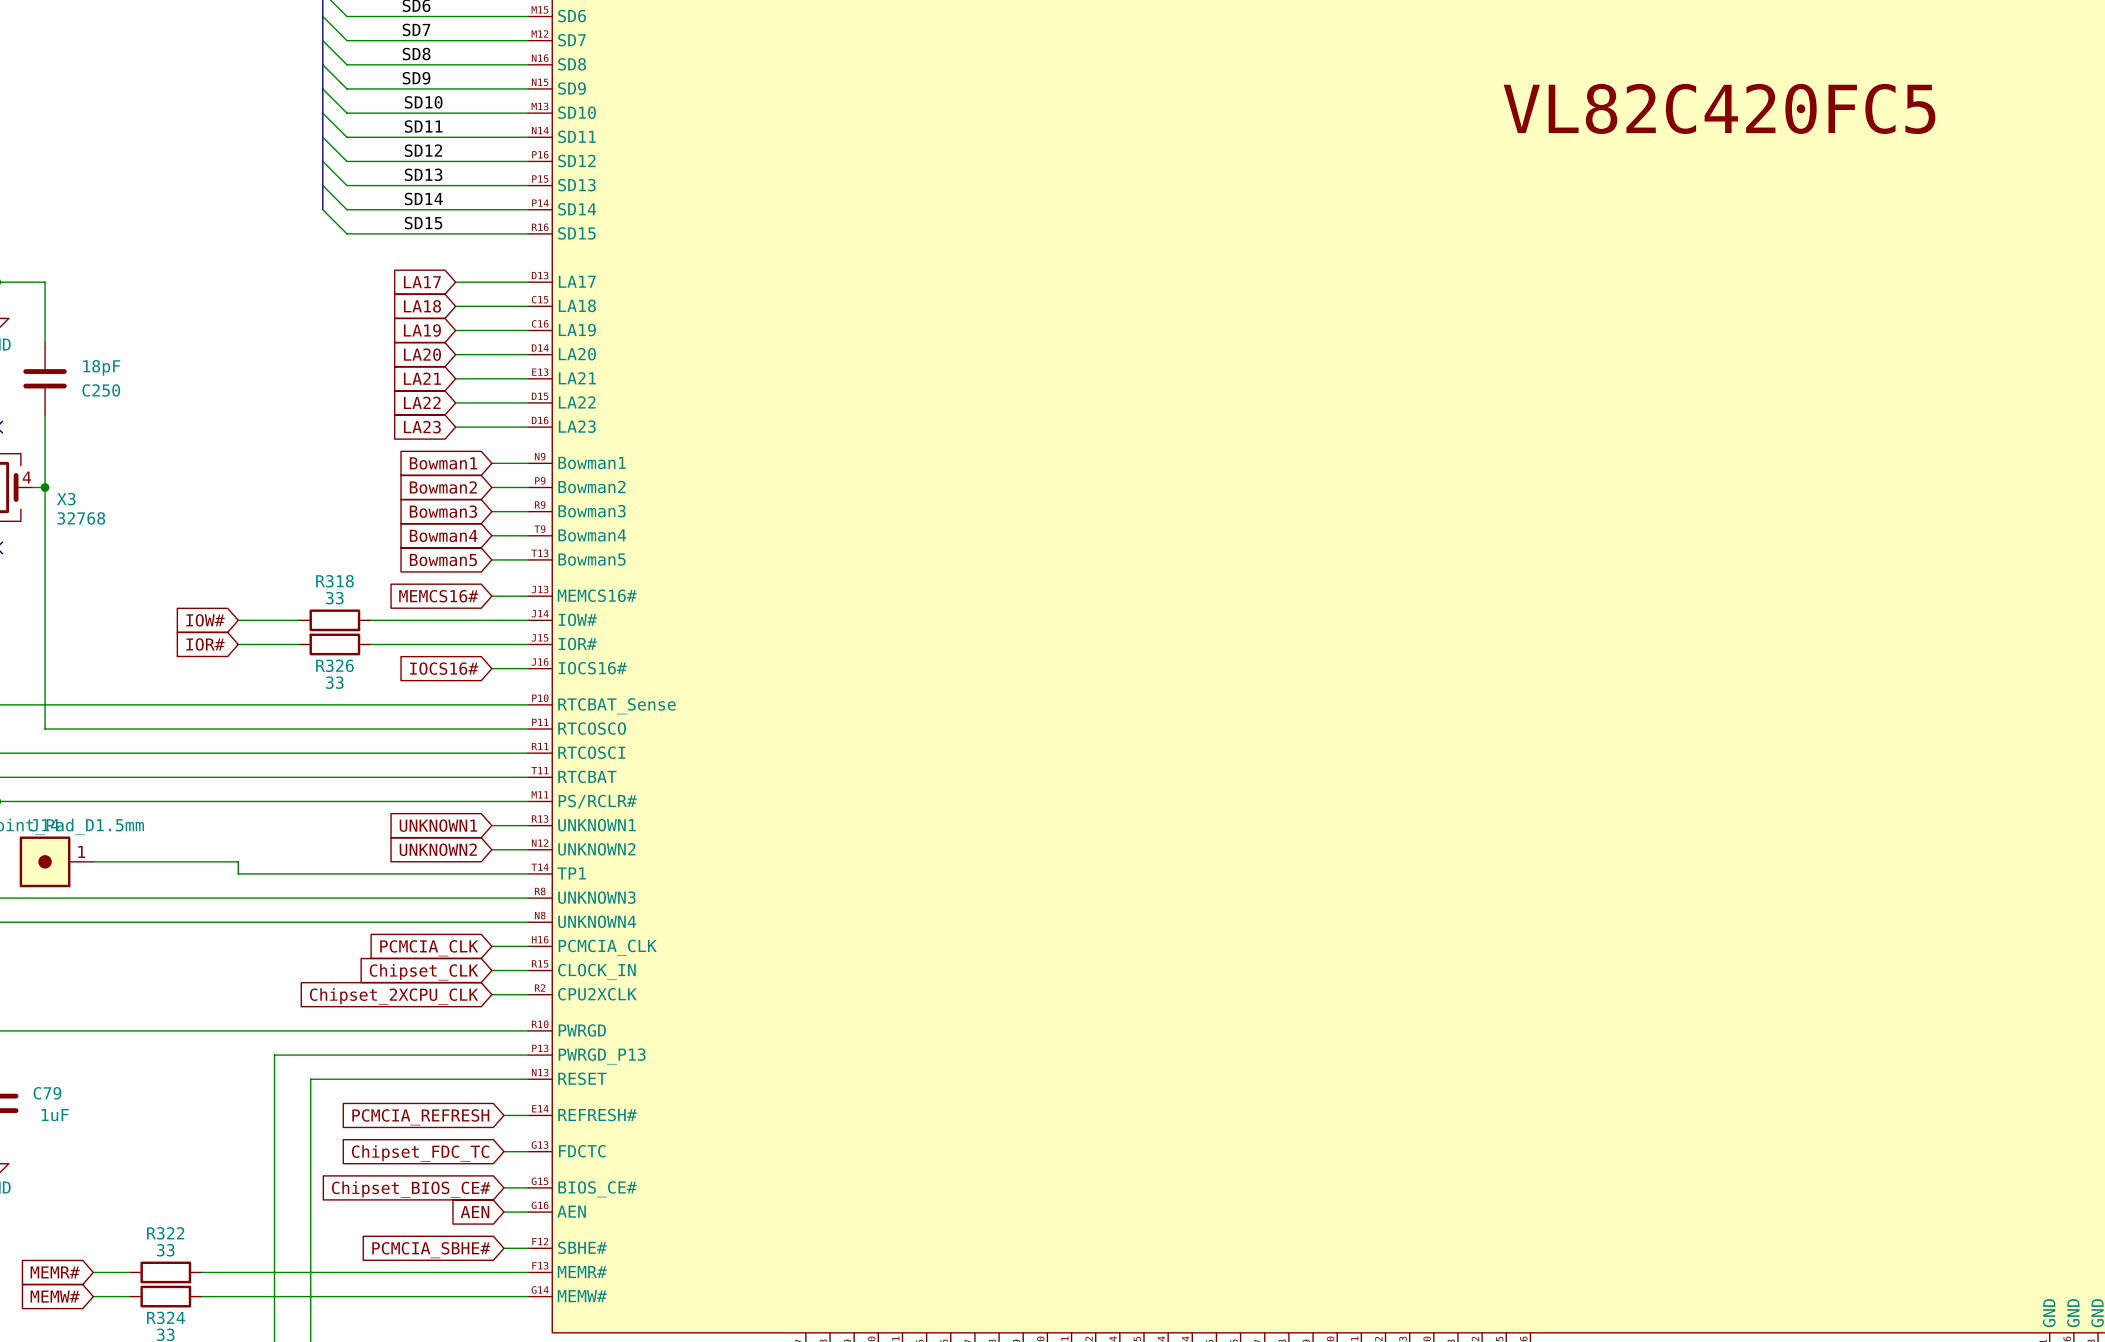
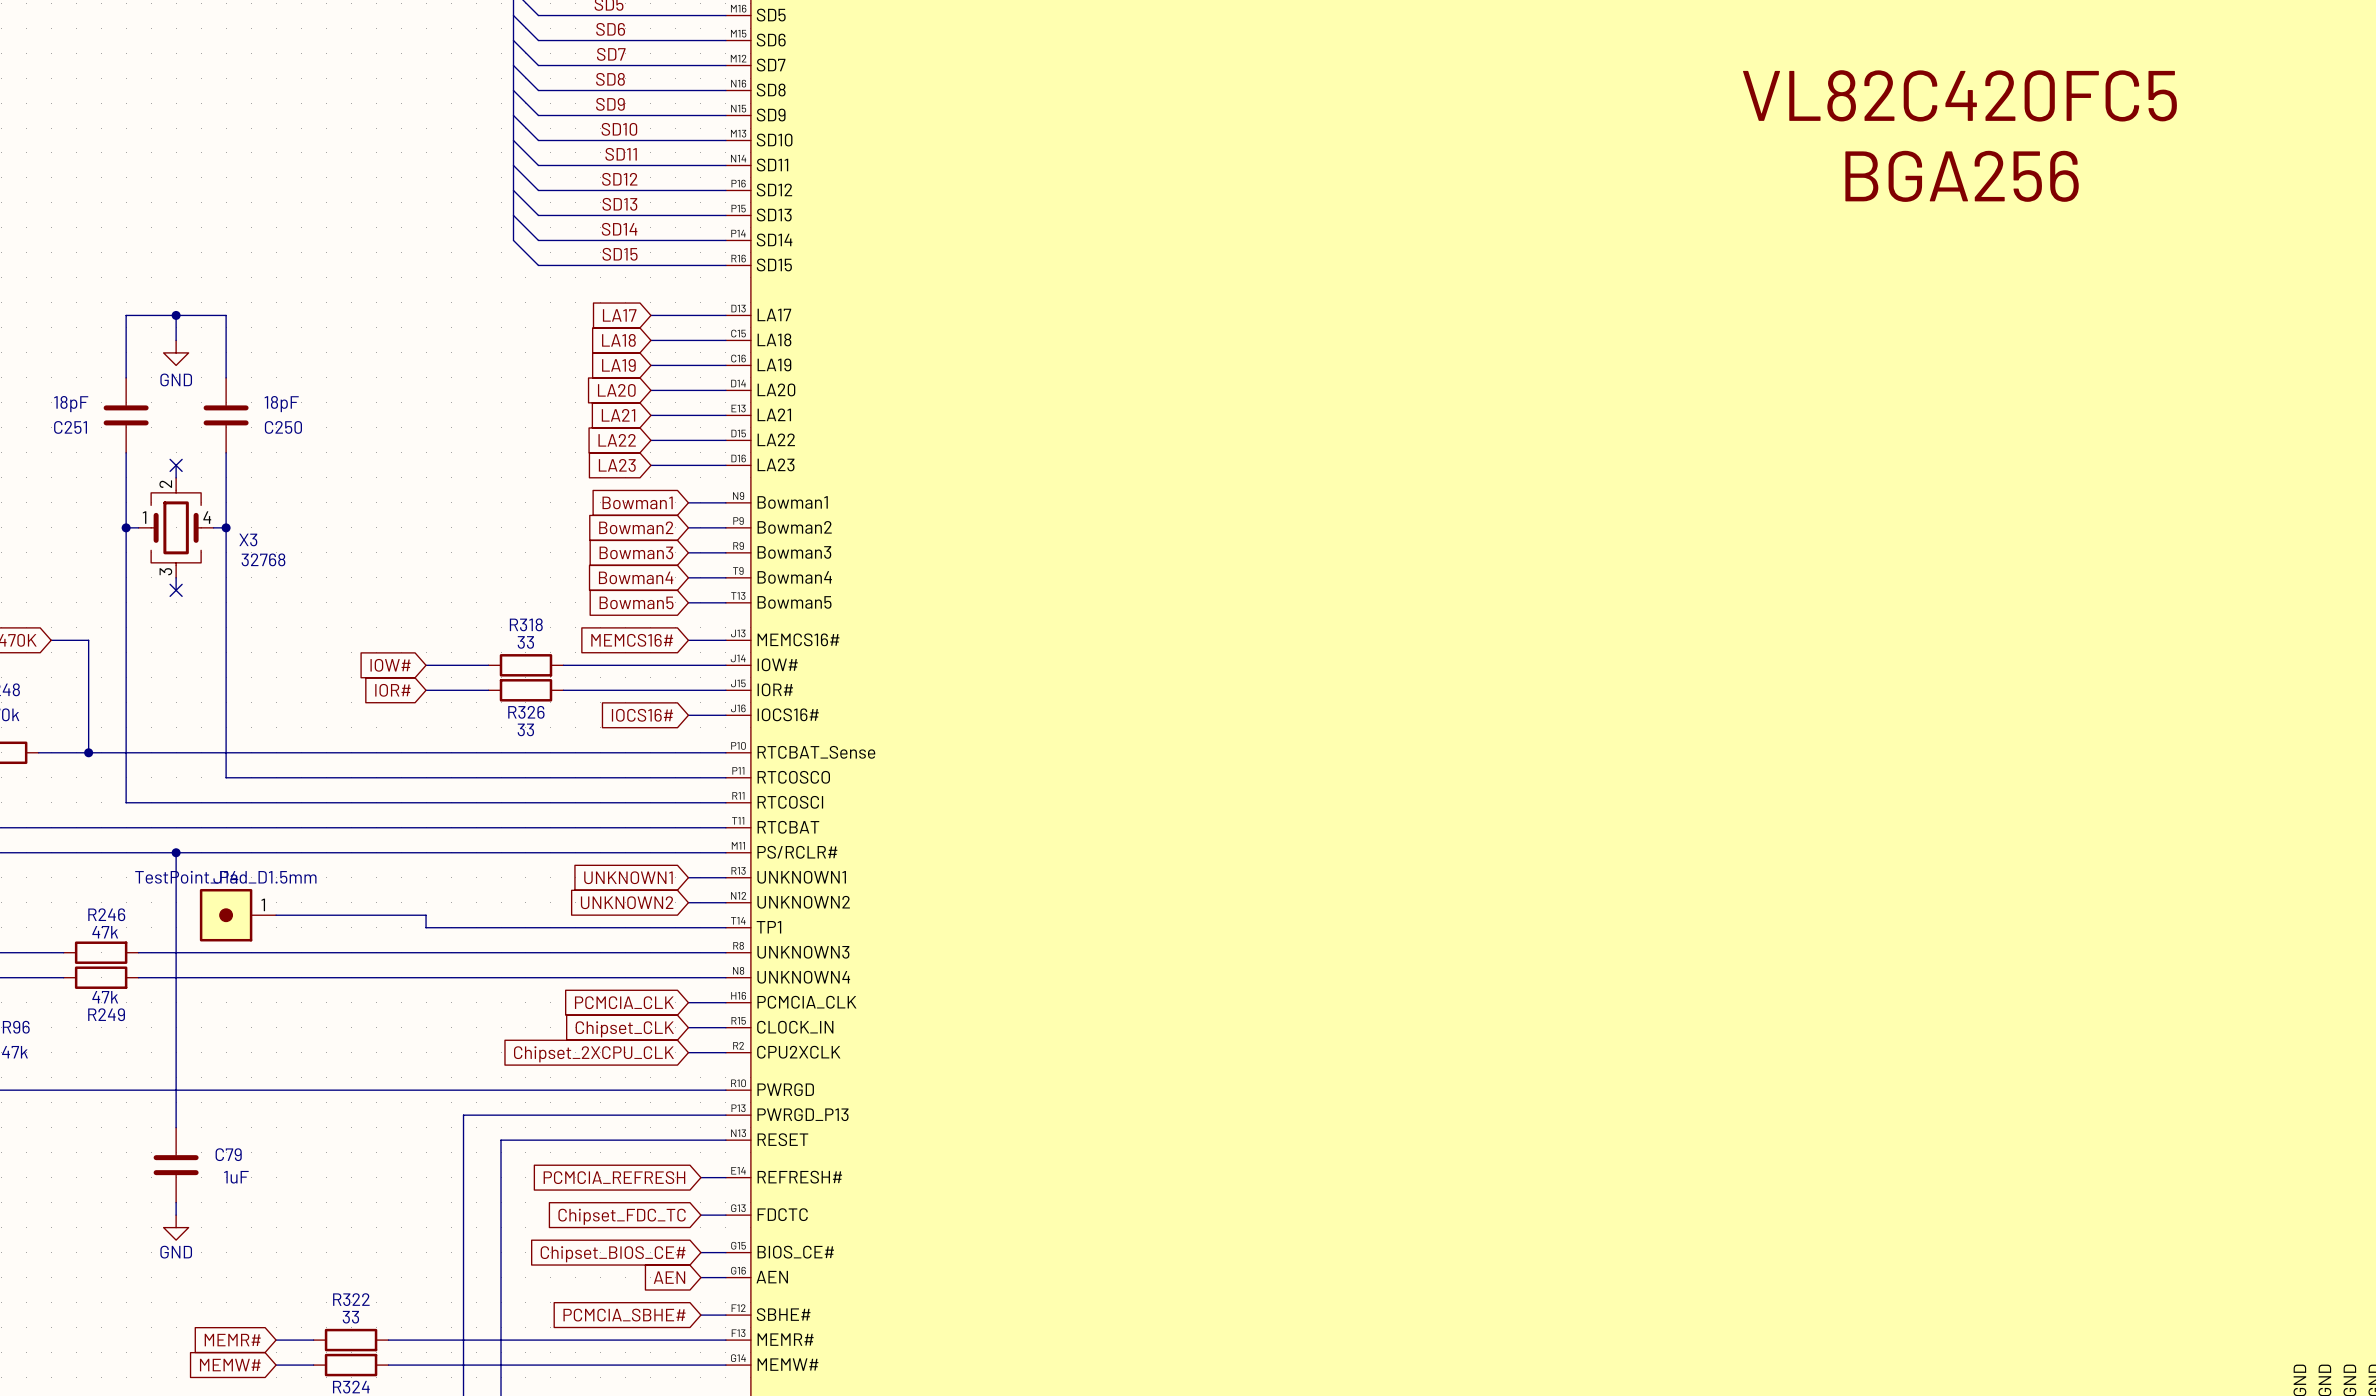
part text position: VL82C420FC5 (1719, 108) -> VL82C420FC5 (1959, 95)
part text: none -> BGA256 (1962, 176)

